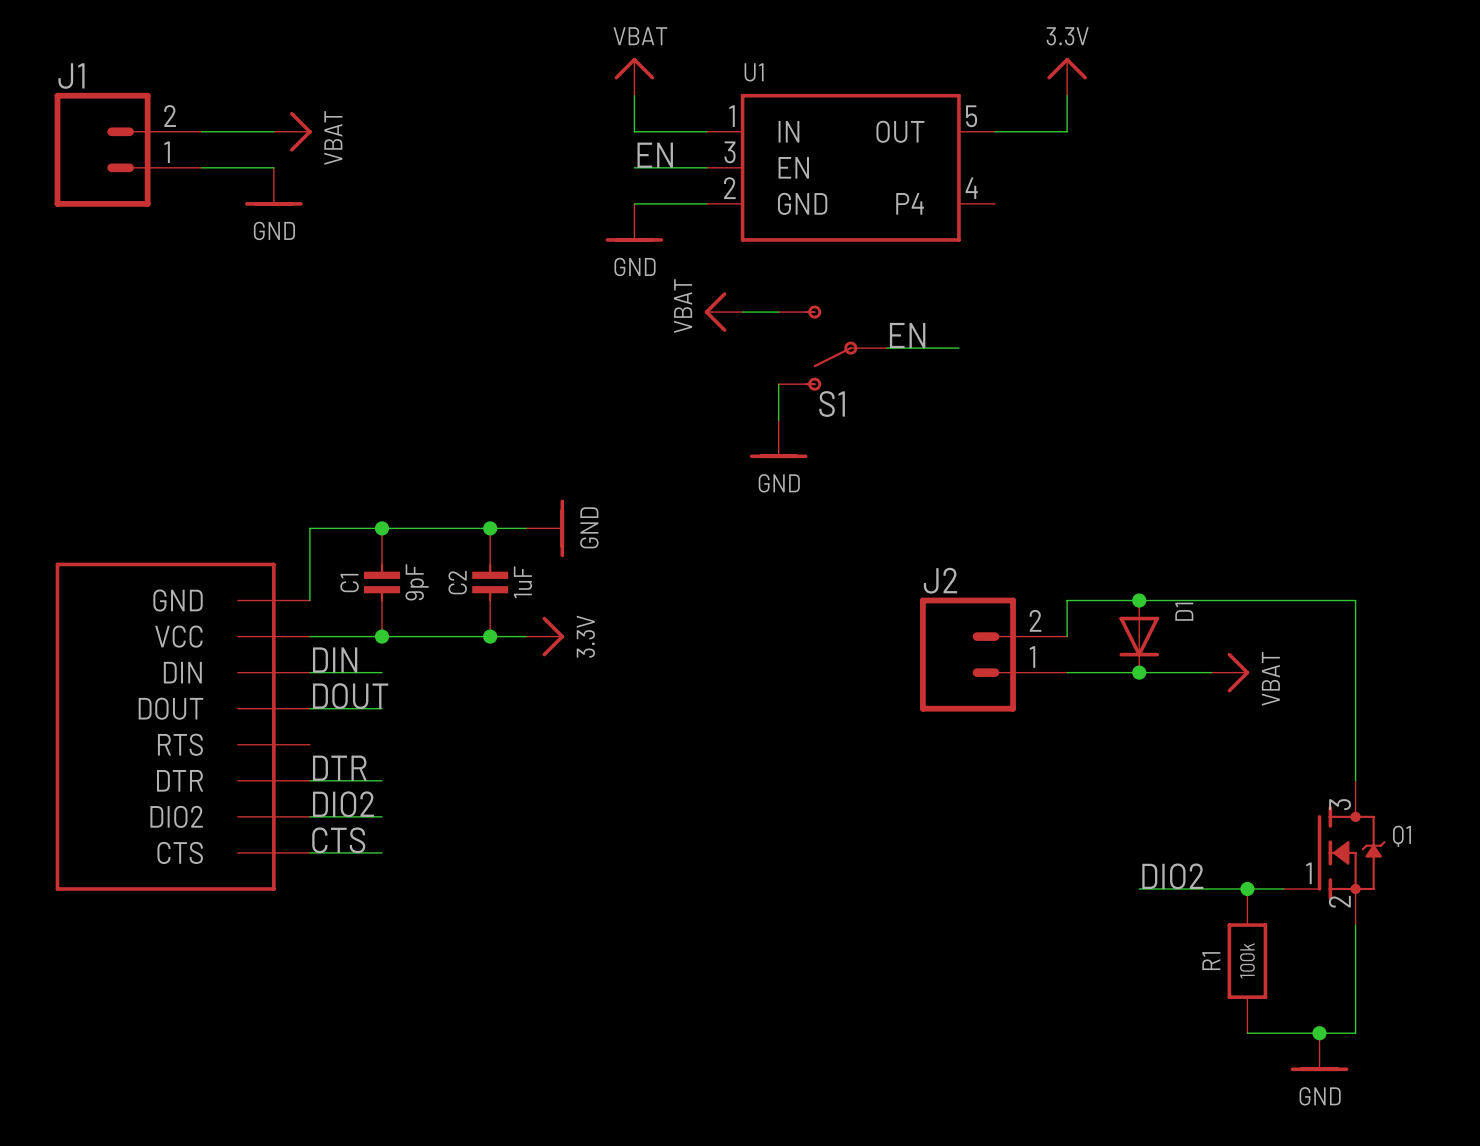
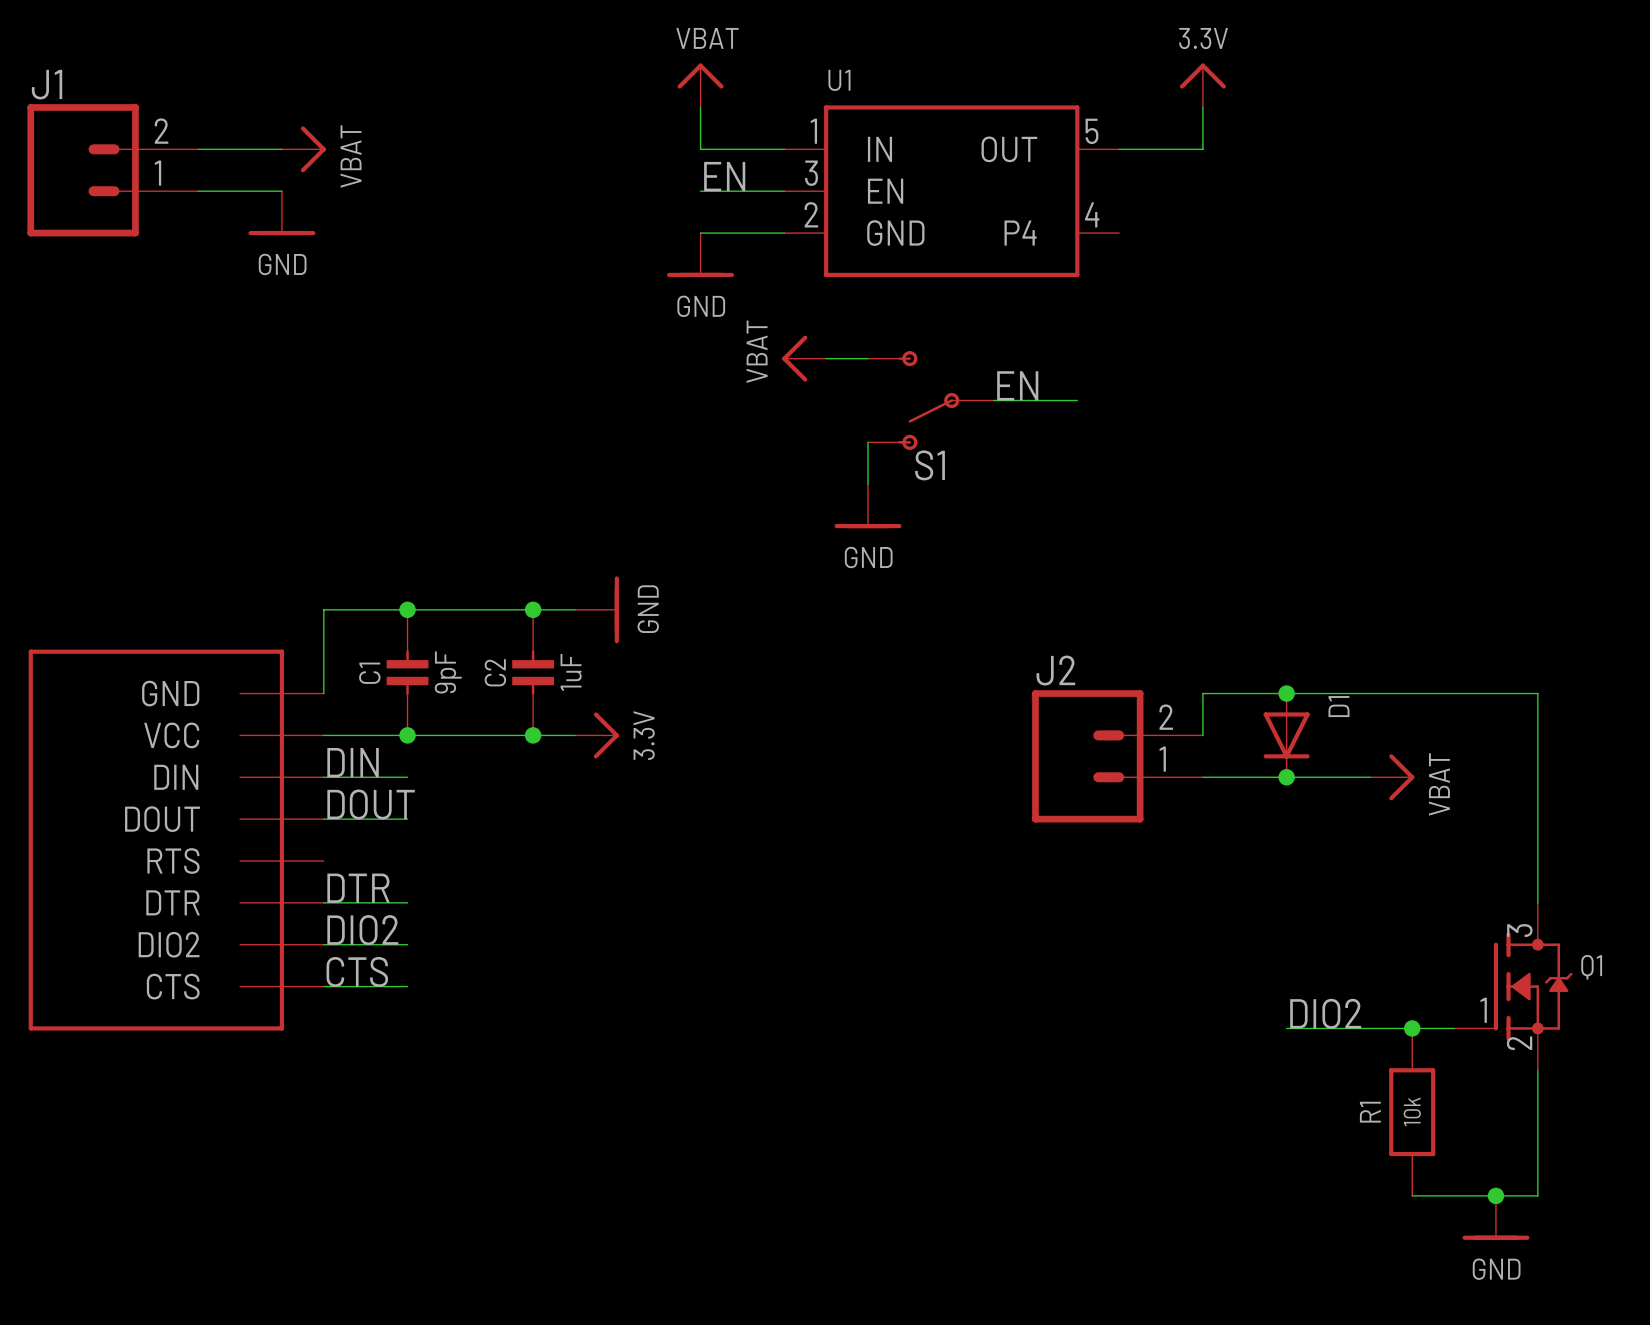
R1 value: 100k (1247, 960) -> 10k (1412, 1111)

